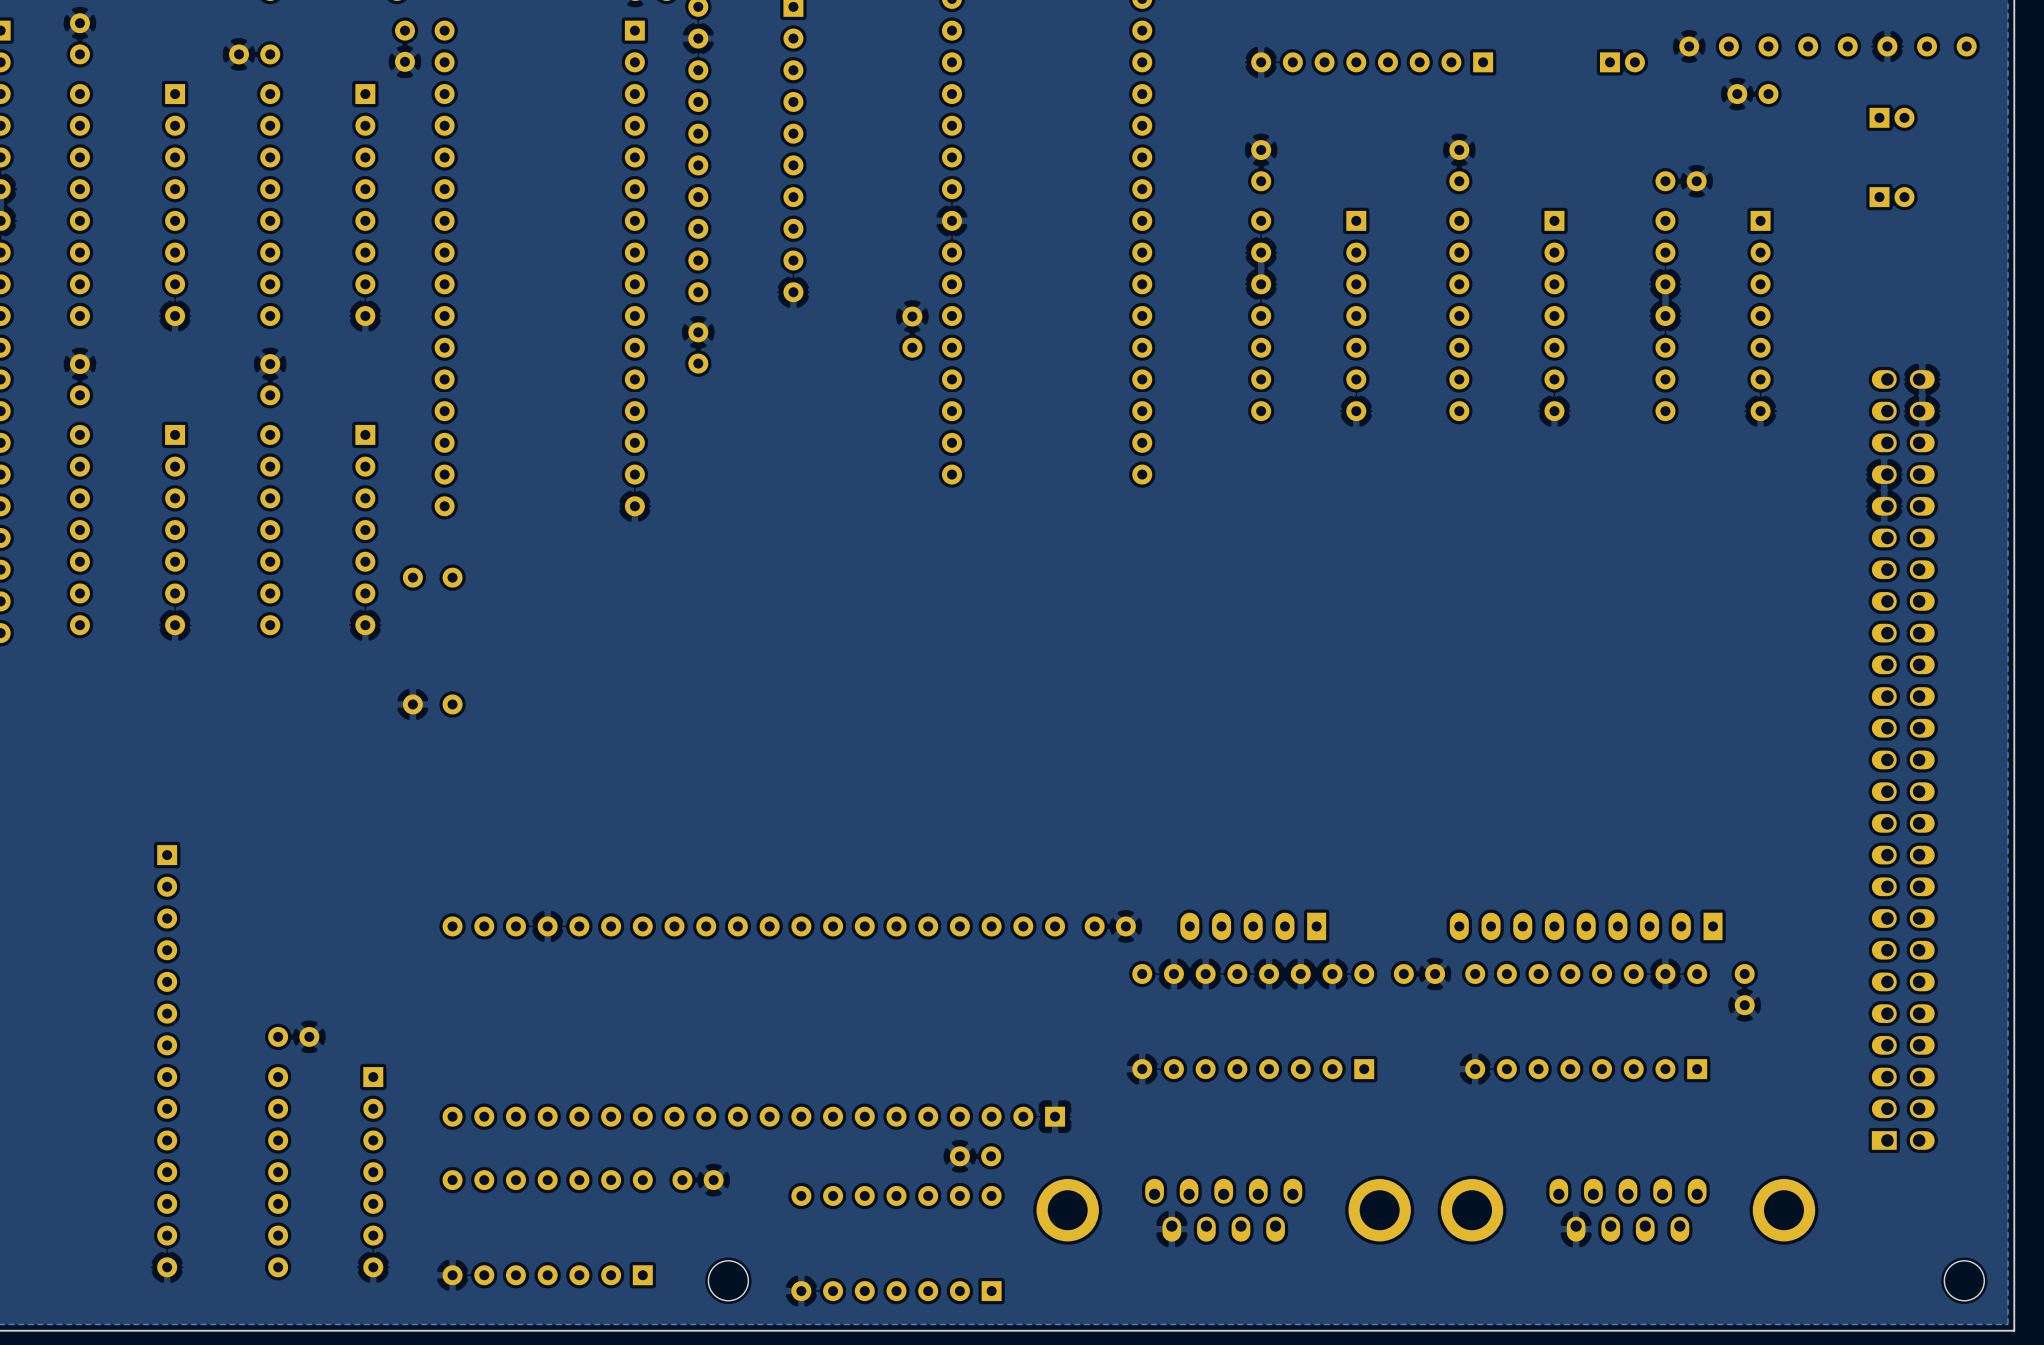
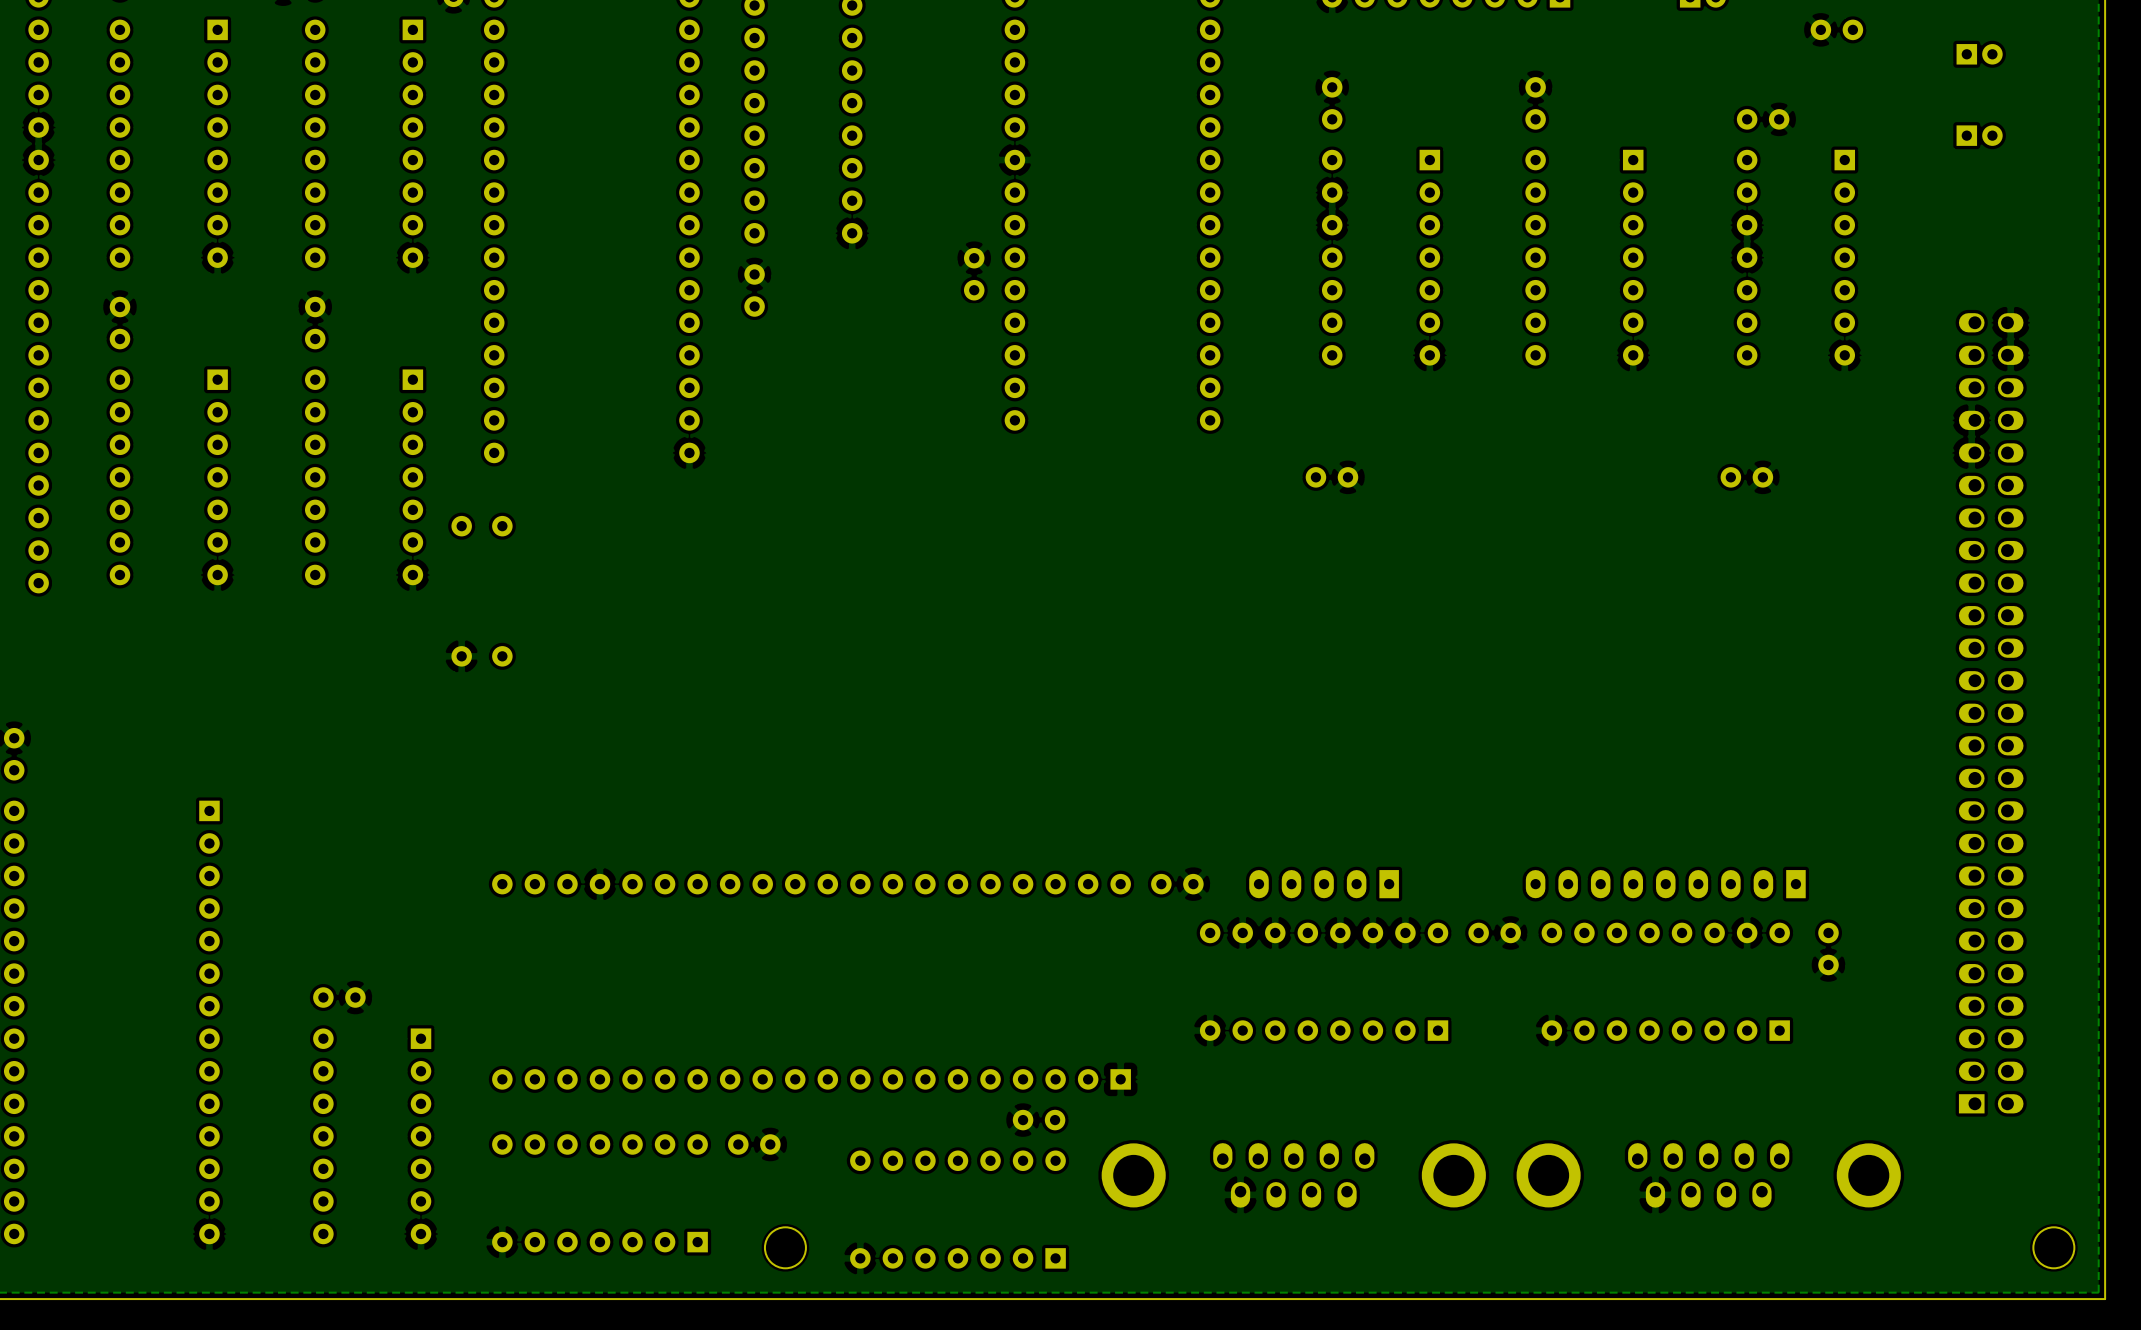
part: none -> (1331, 477)
part: none -> (1746, 477)

